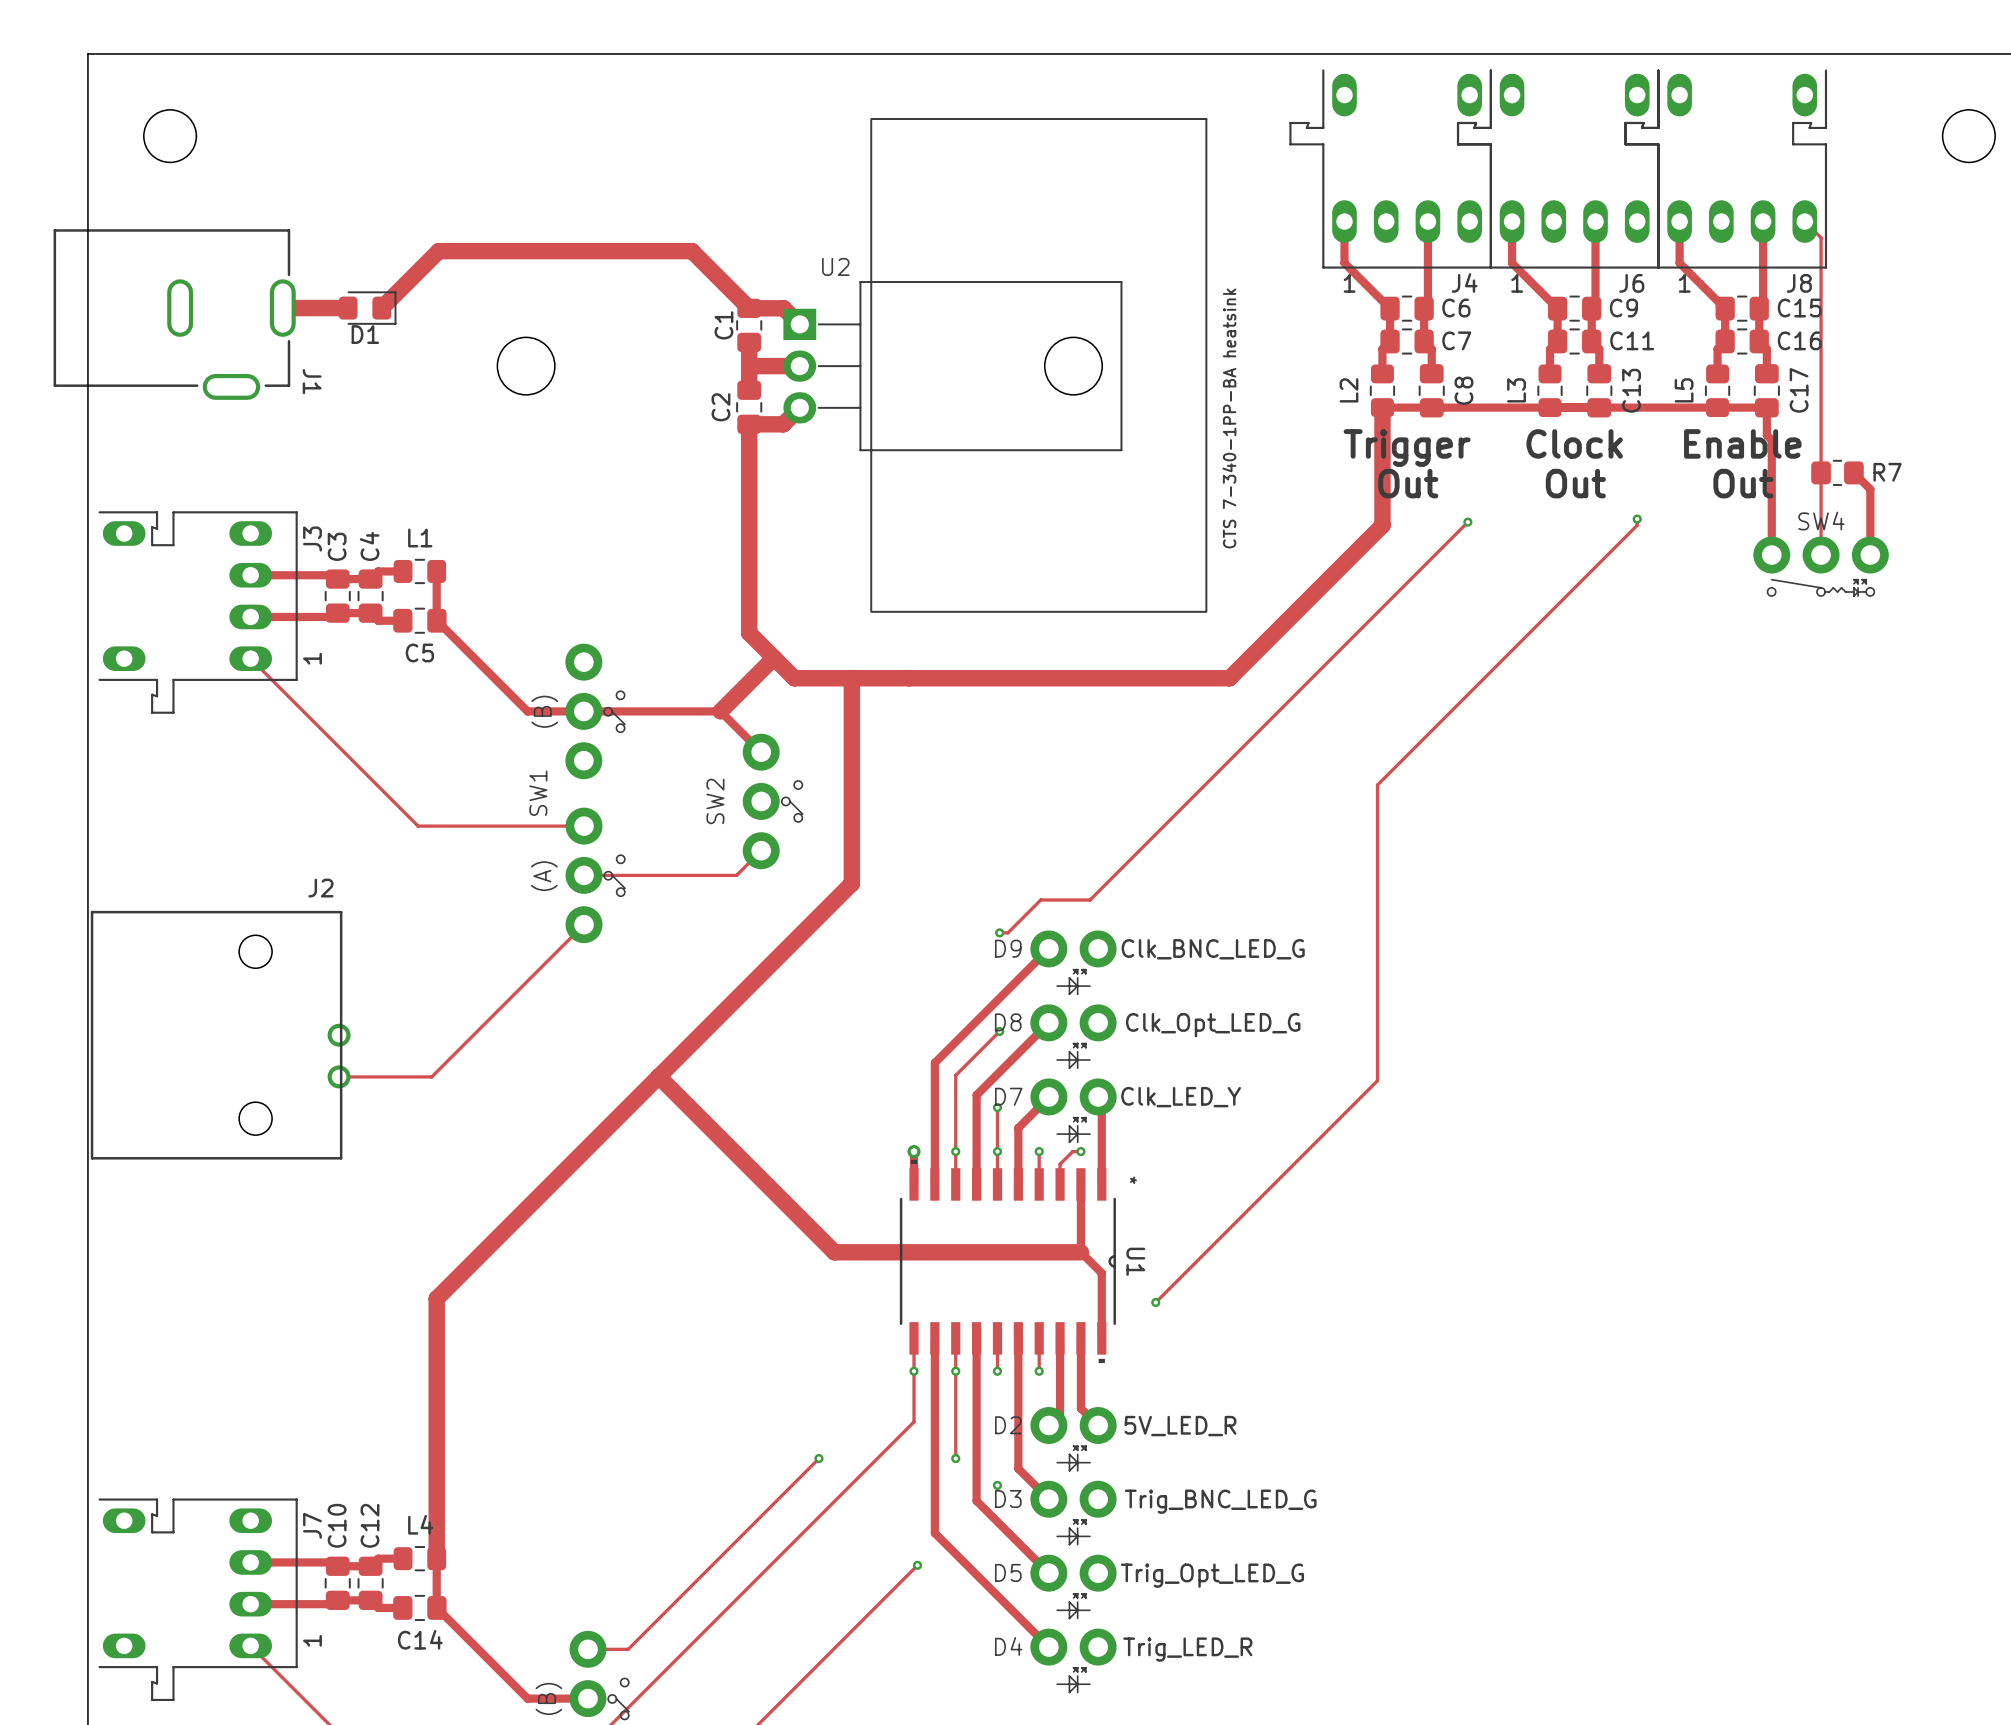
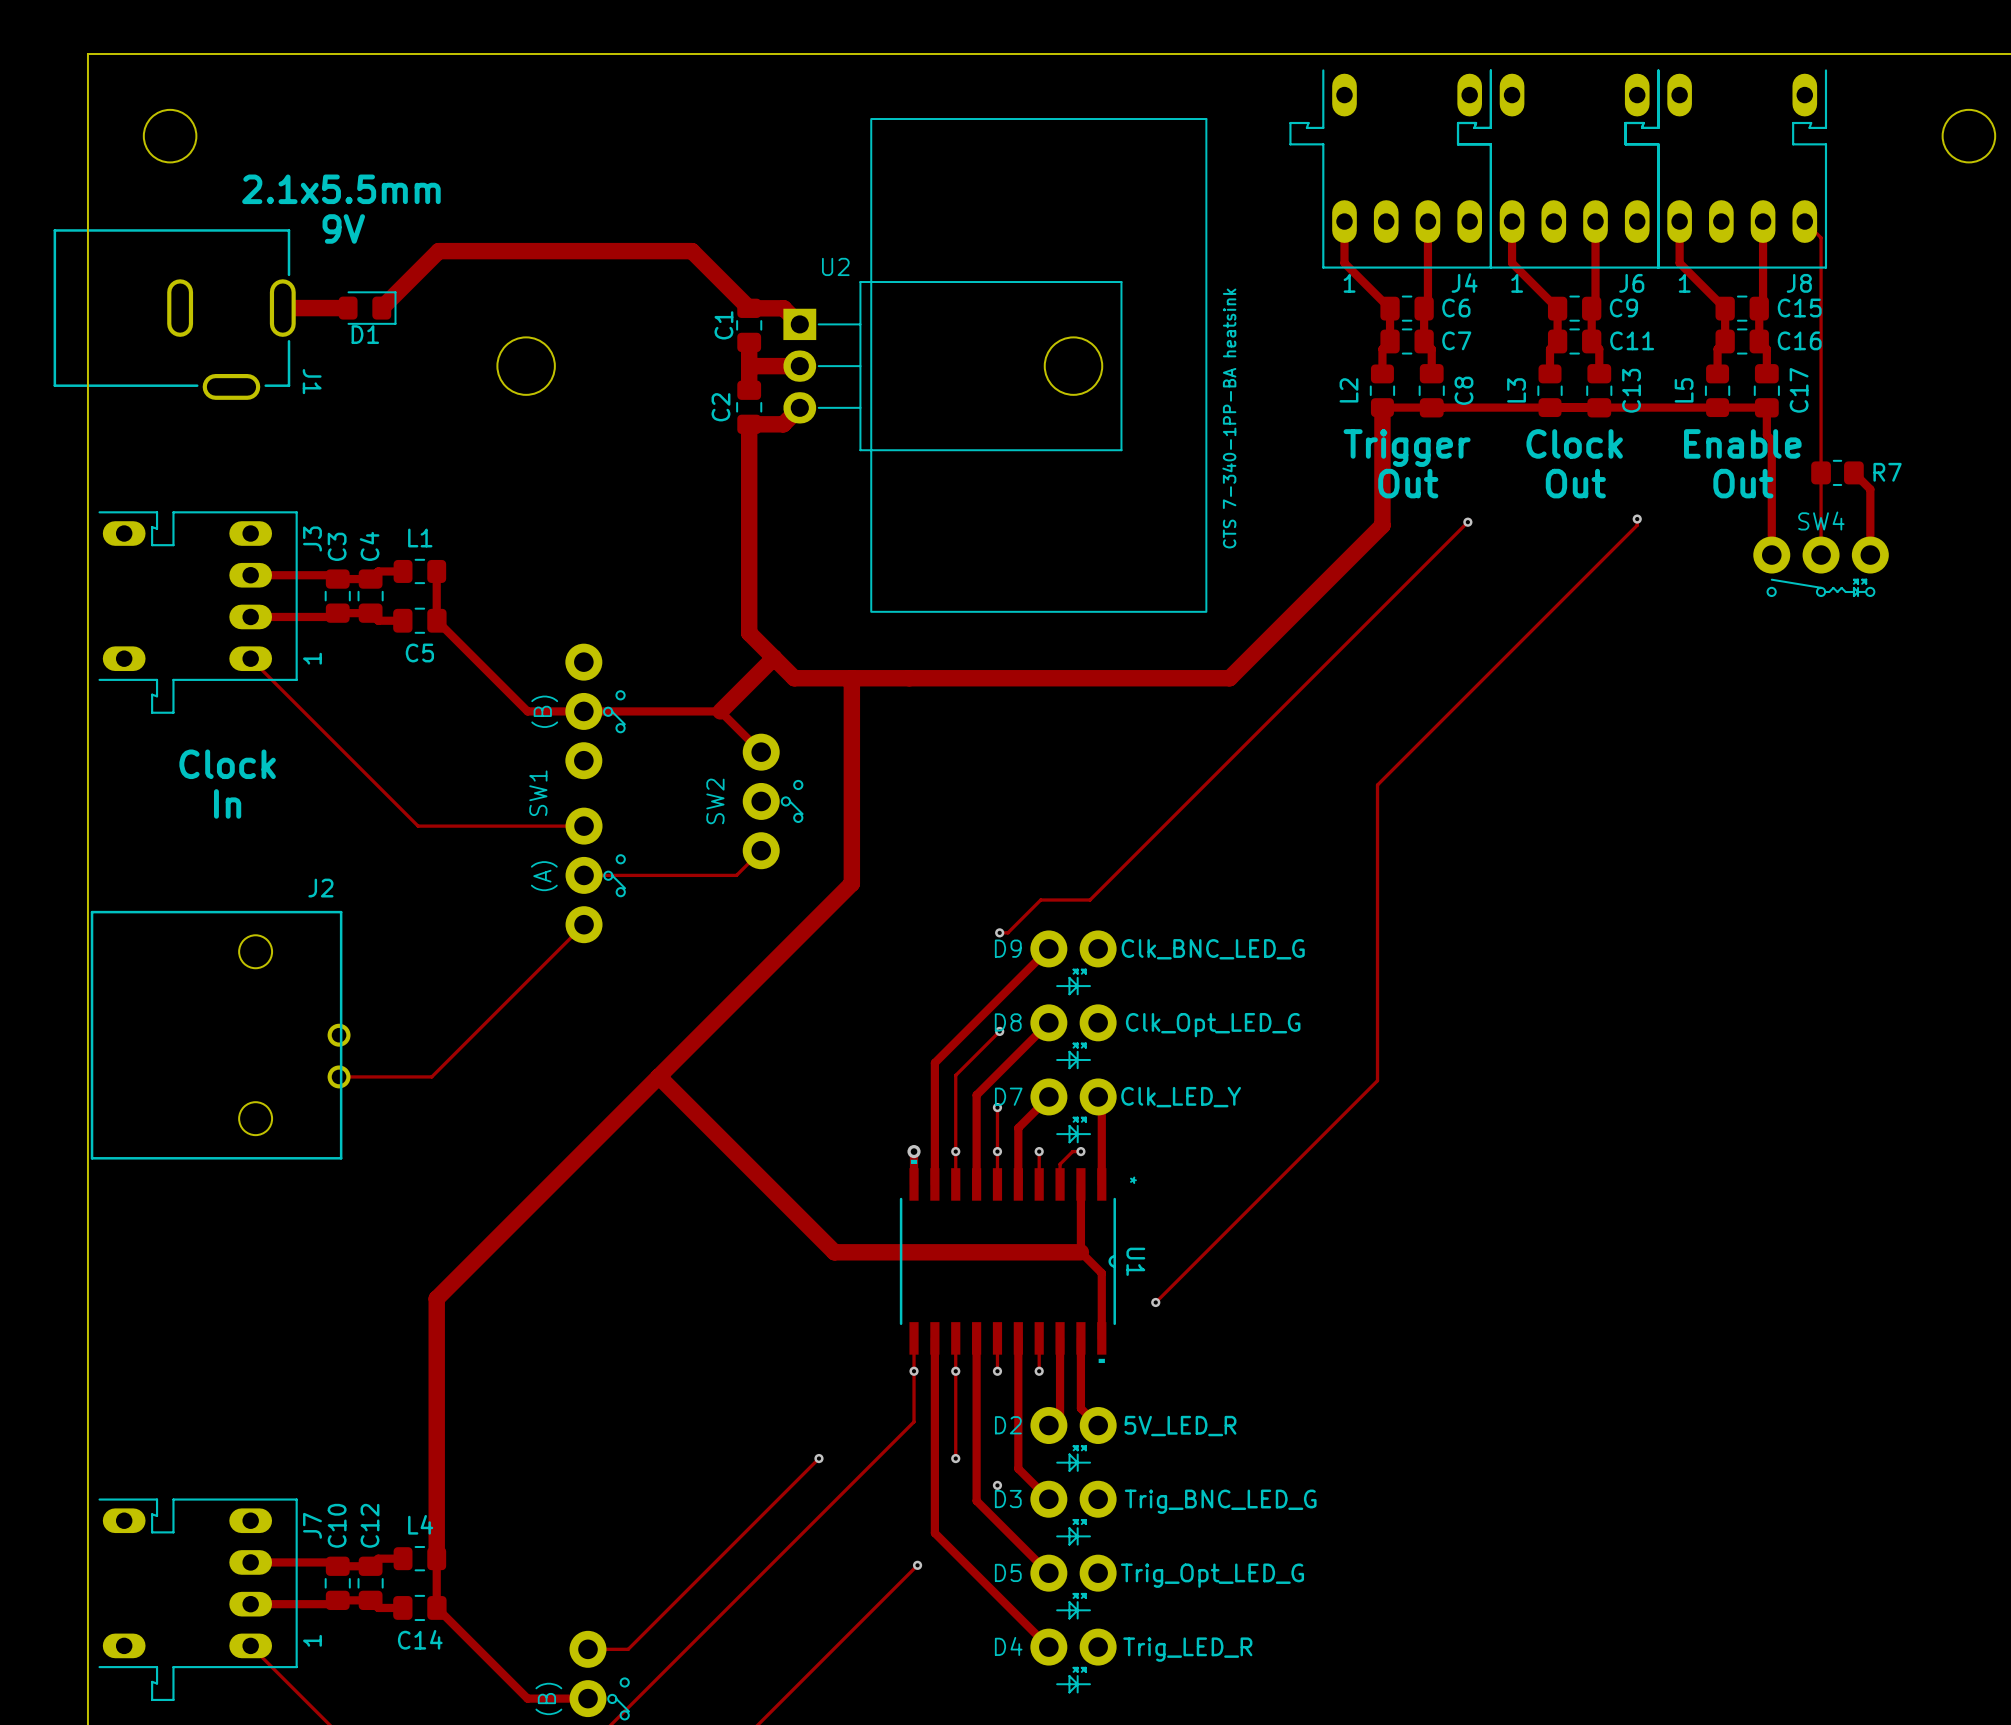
text: none -> 2.1x5.5mm (341, 189)
text: none -> 9V (343, 228)
text: none -> Clock (227, 764)
text: none -> In (227, 803)

